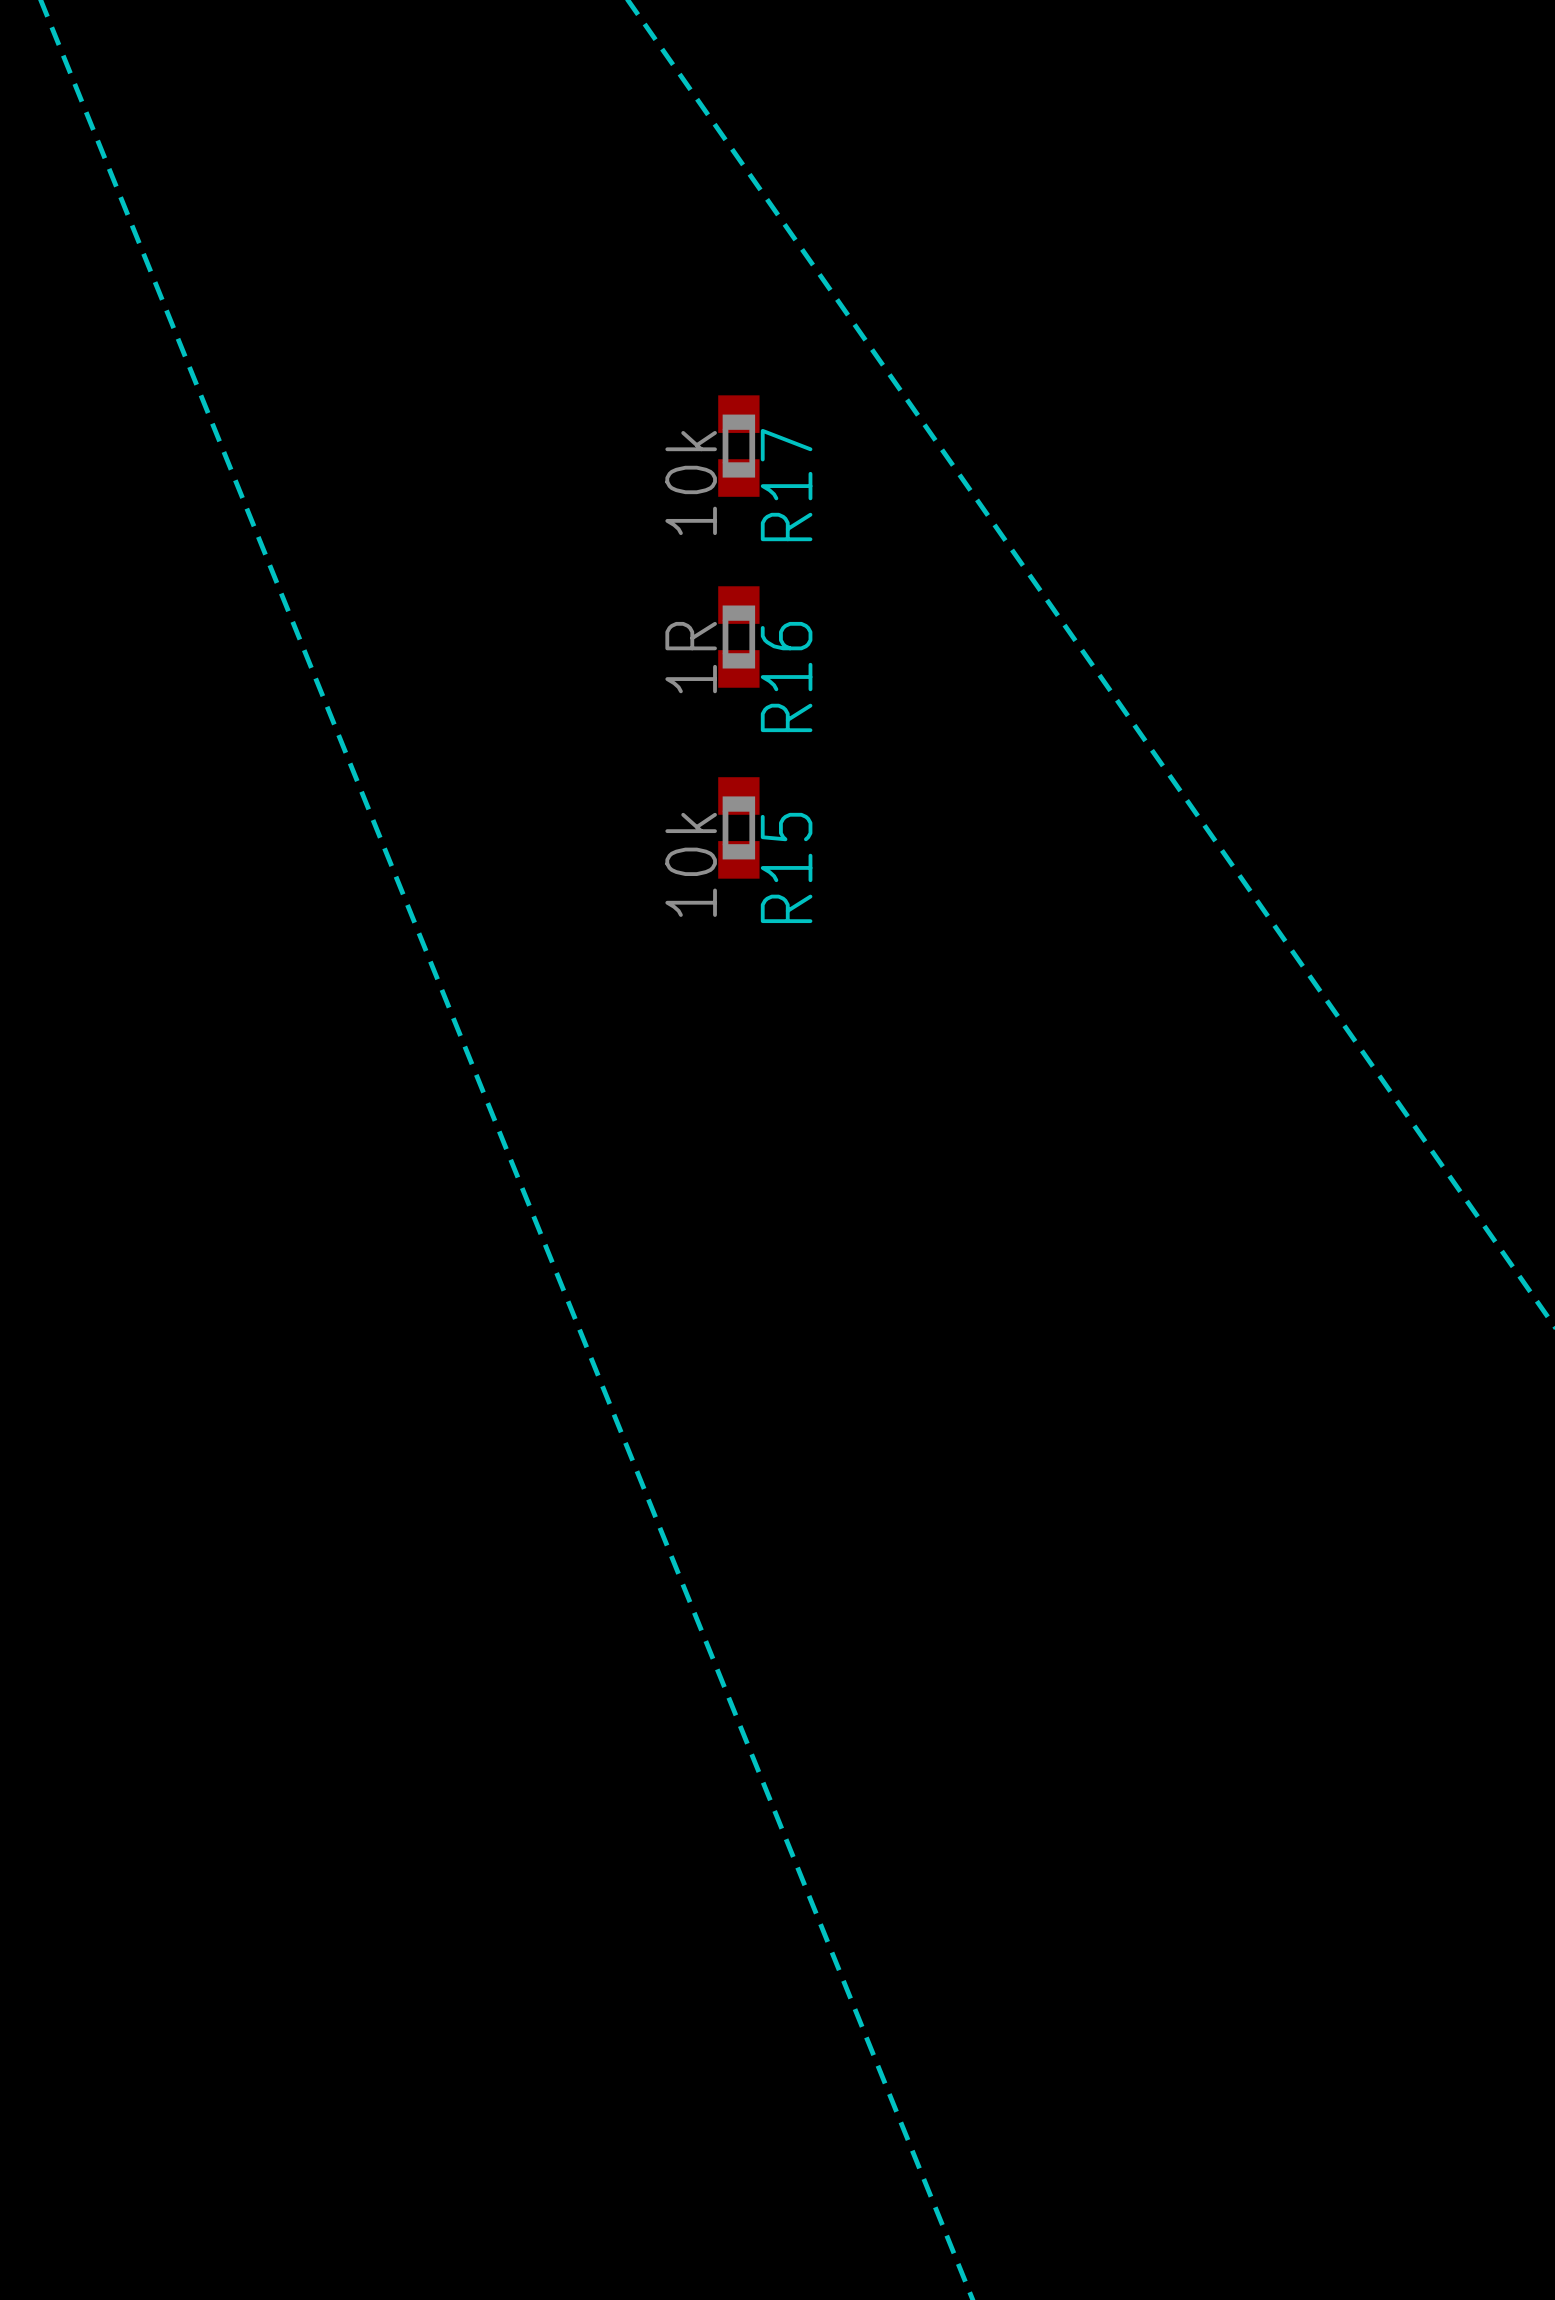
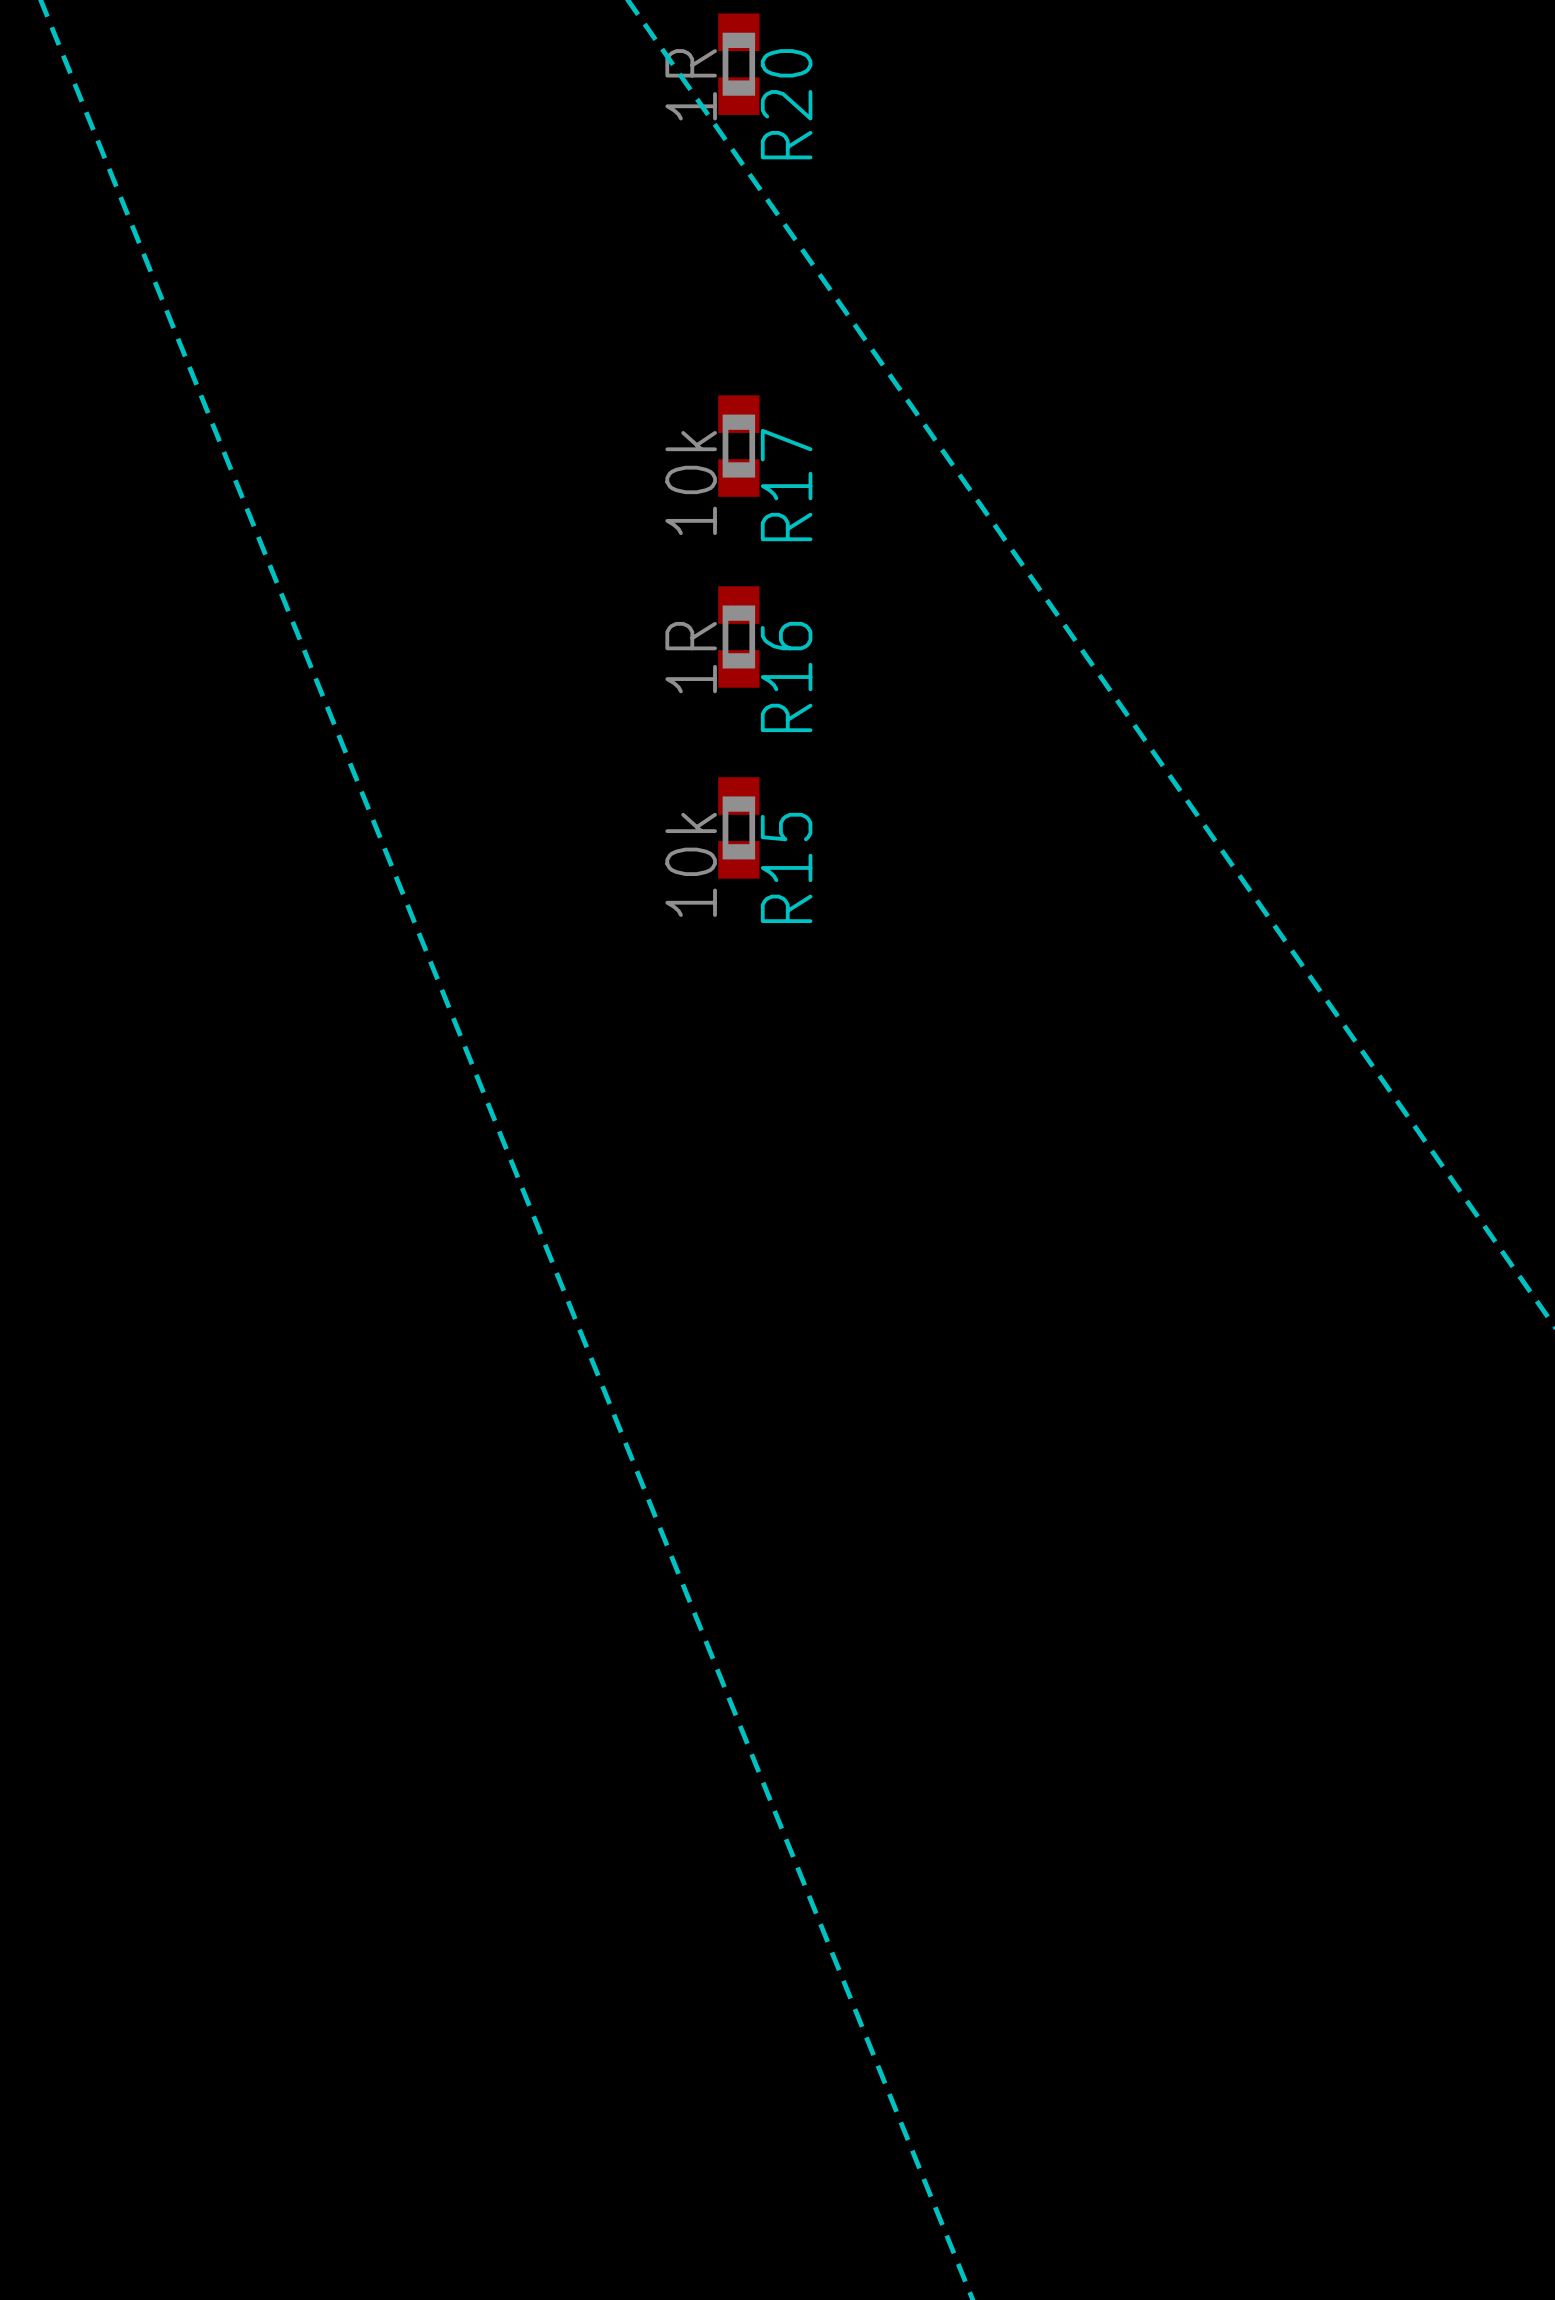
R20: none -> 1R (738, 64)

